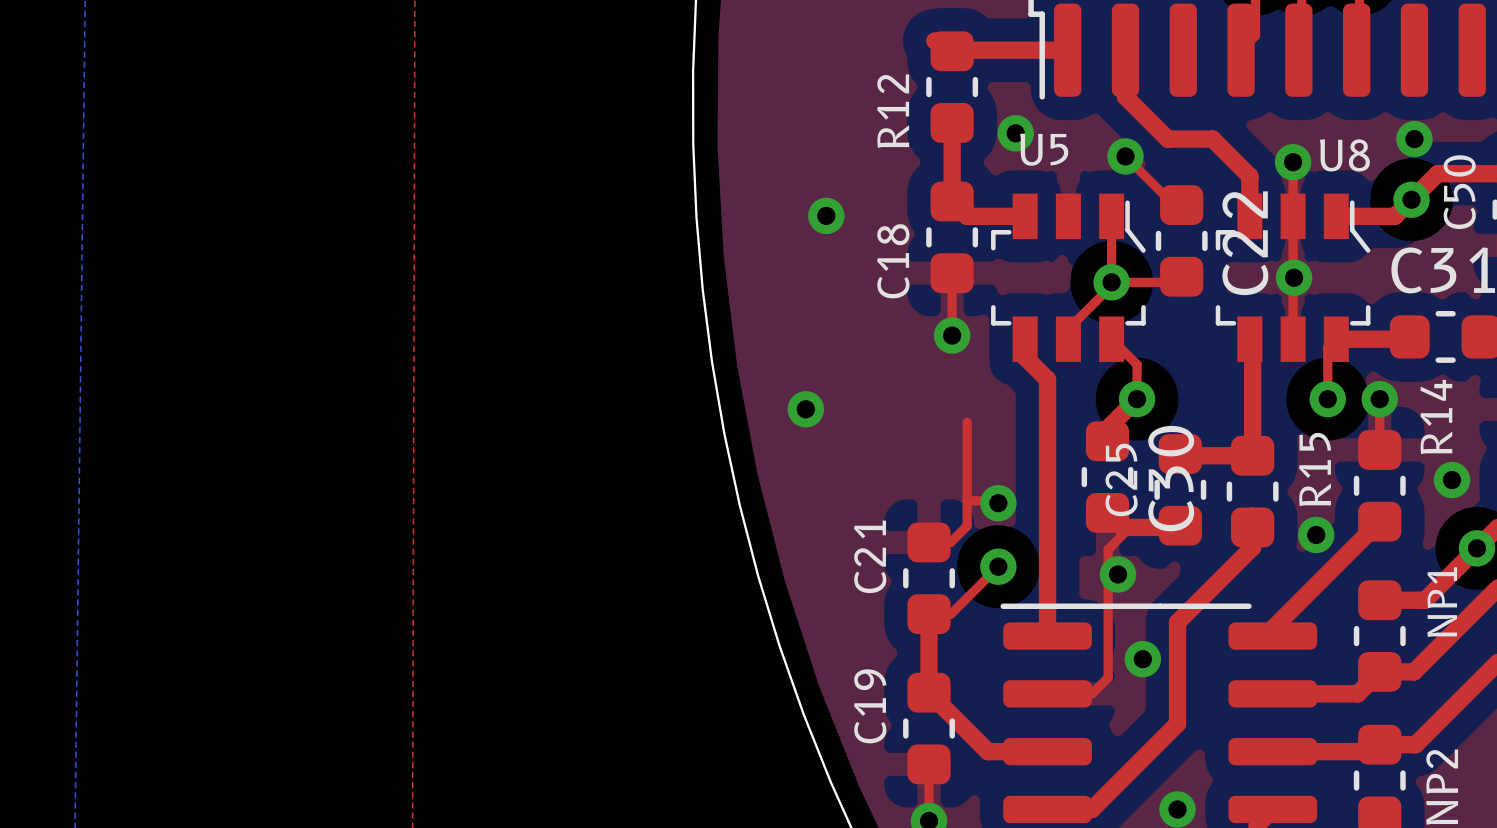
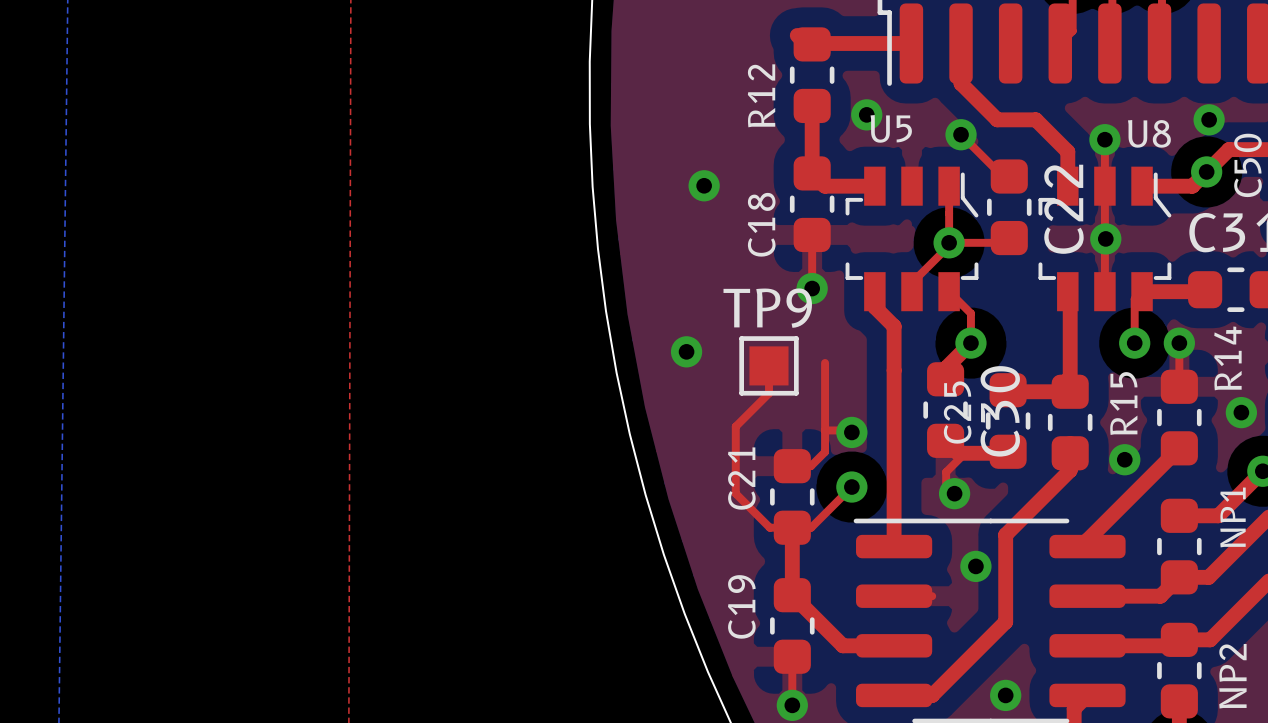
top track: none -> (769, 365) (769, 393) (735, 426) (735, 493) (769, 527) (792, 527)
TP9: none -> (769, 365)
top track: (1108, 575) (1108, 677) (1091, 693) -> none

